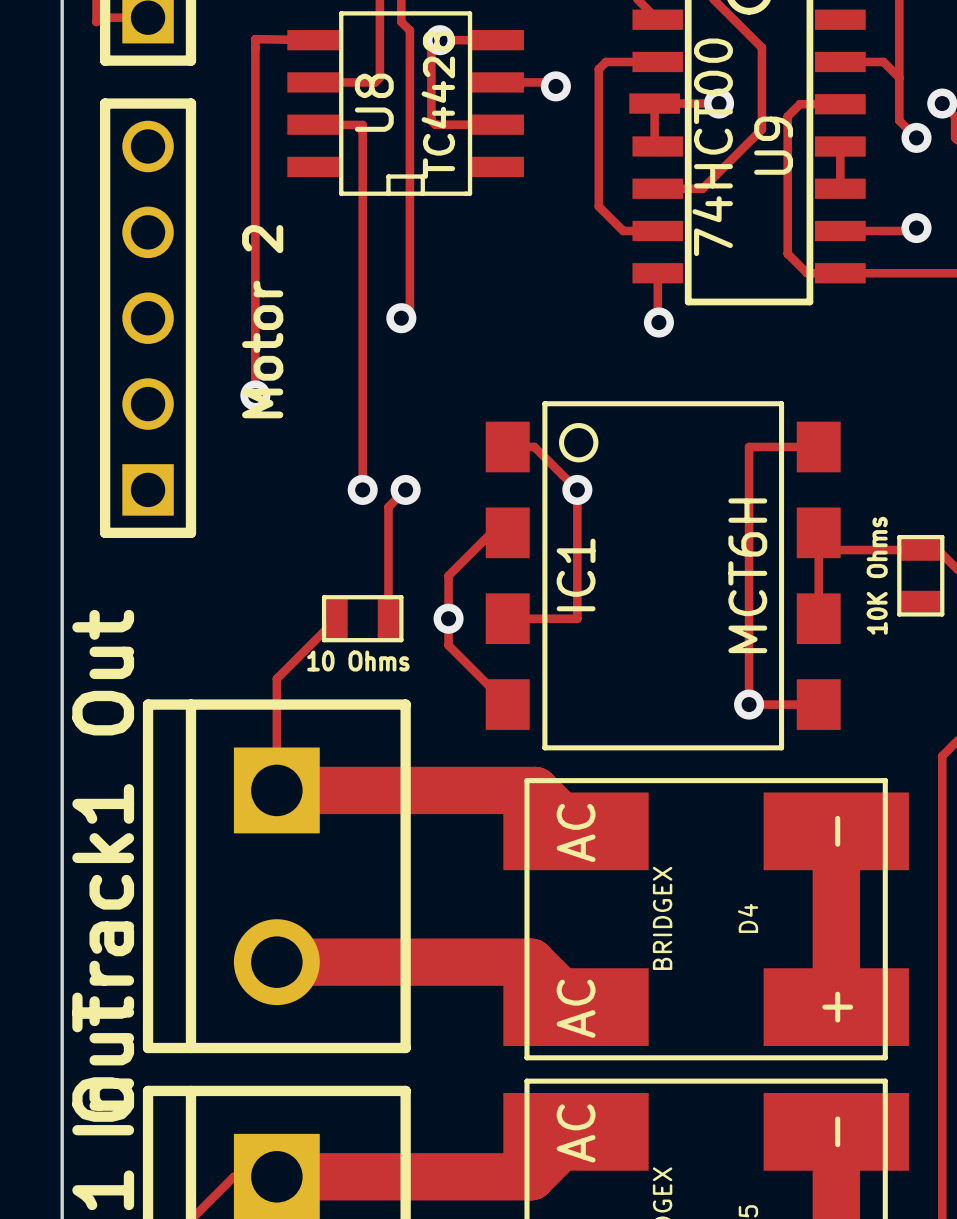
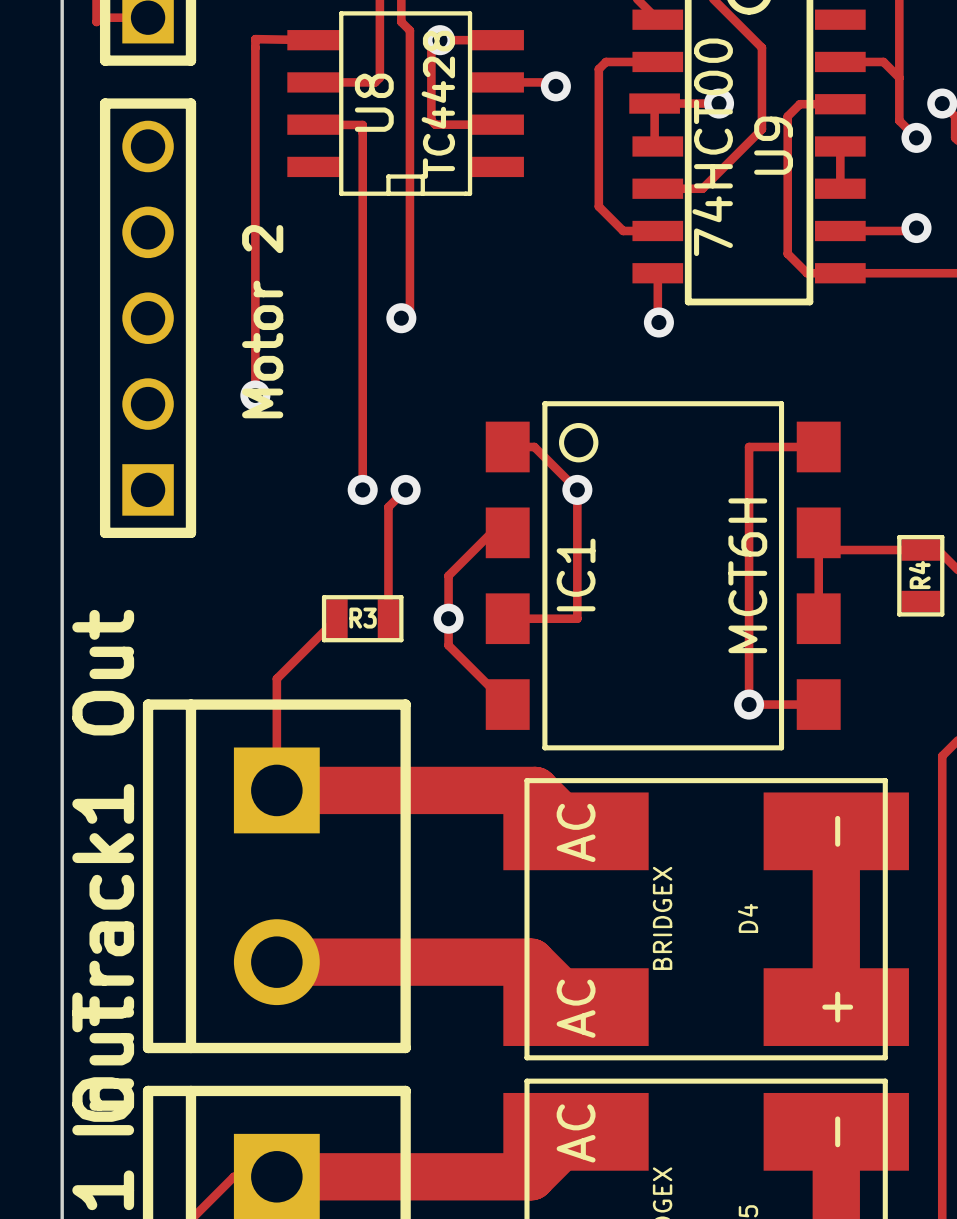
R4 value: 10K Ohms (877, 575) -> none
R4 name: none -> R4 (919, 575)
R3 name: none -> R3 (363, 618)
R3 value: 10 Ohms (358, 661) -> none

